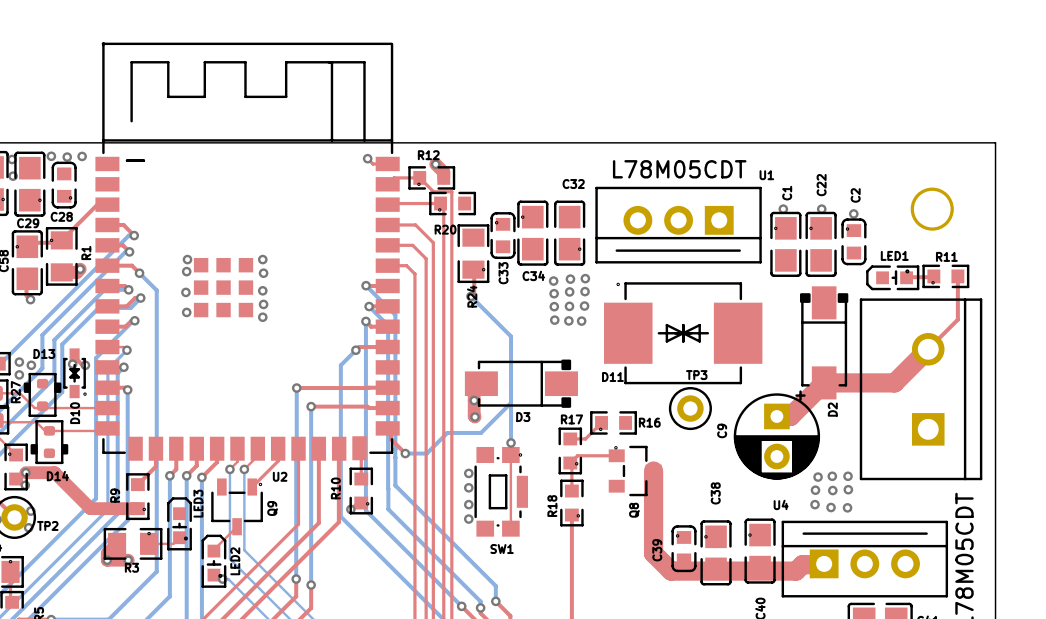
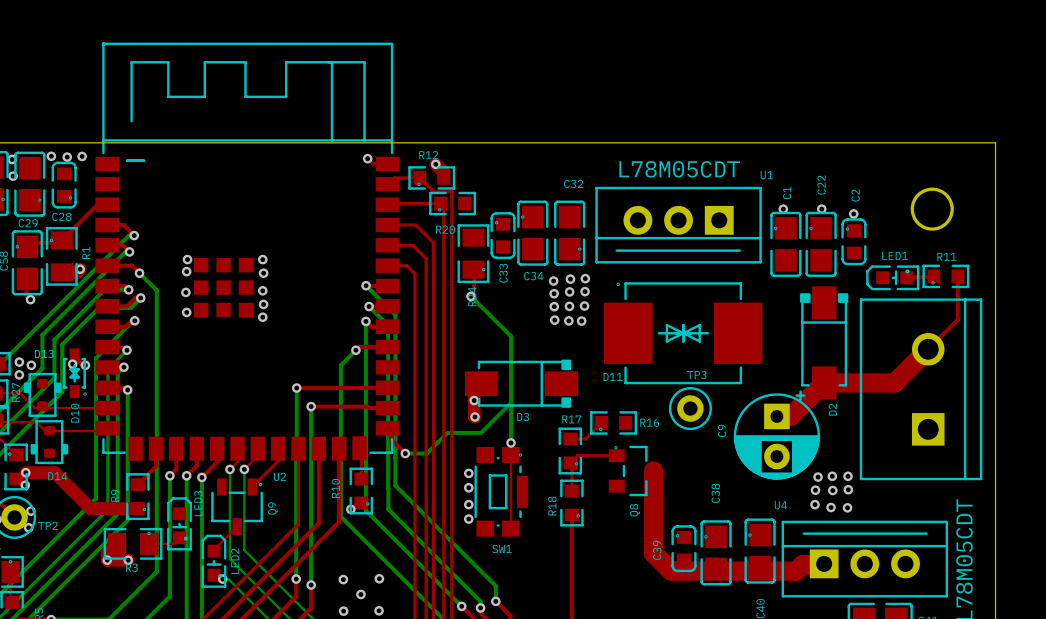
via: none -> (379, 578)
via: none -> (343, 579)
via: none -> (360, 594)
via: none -> (379, 610)
via: none -> (343, 611)

